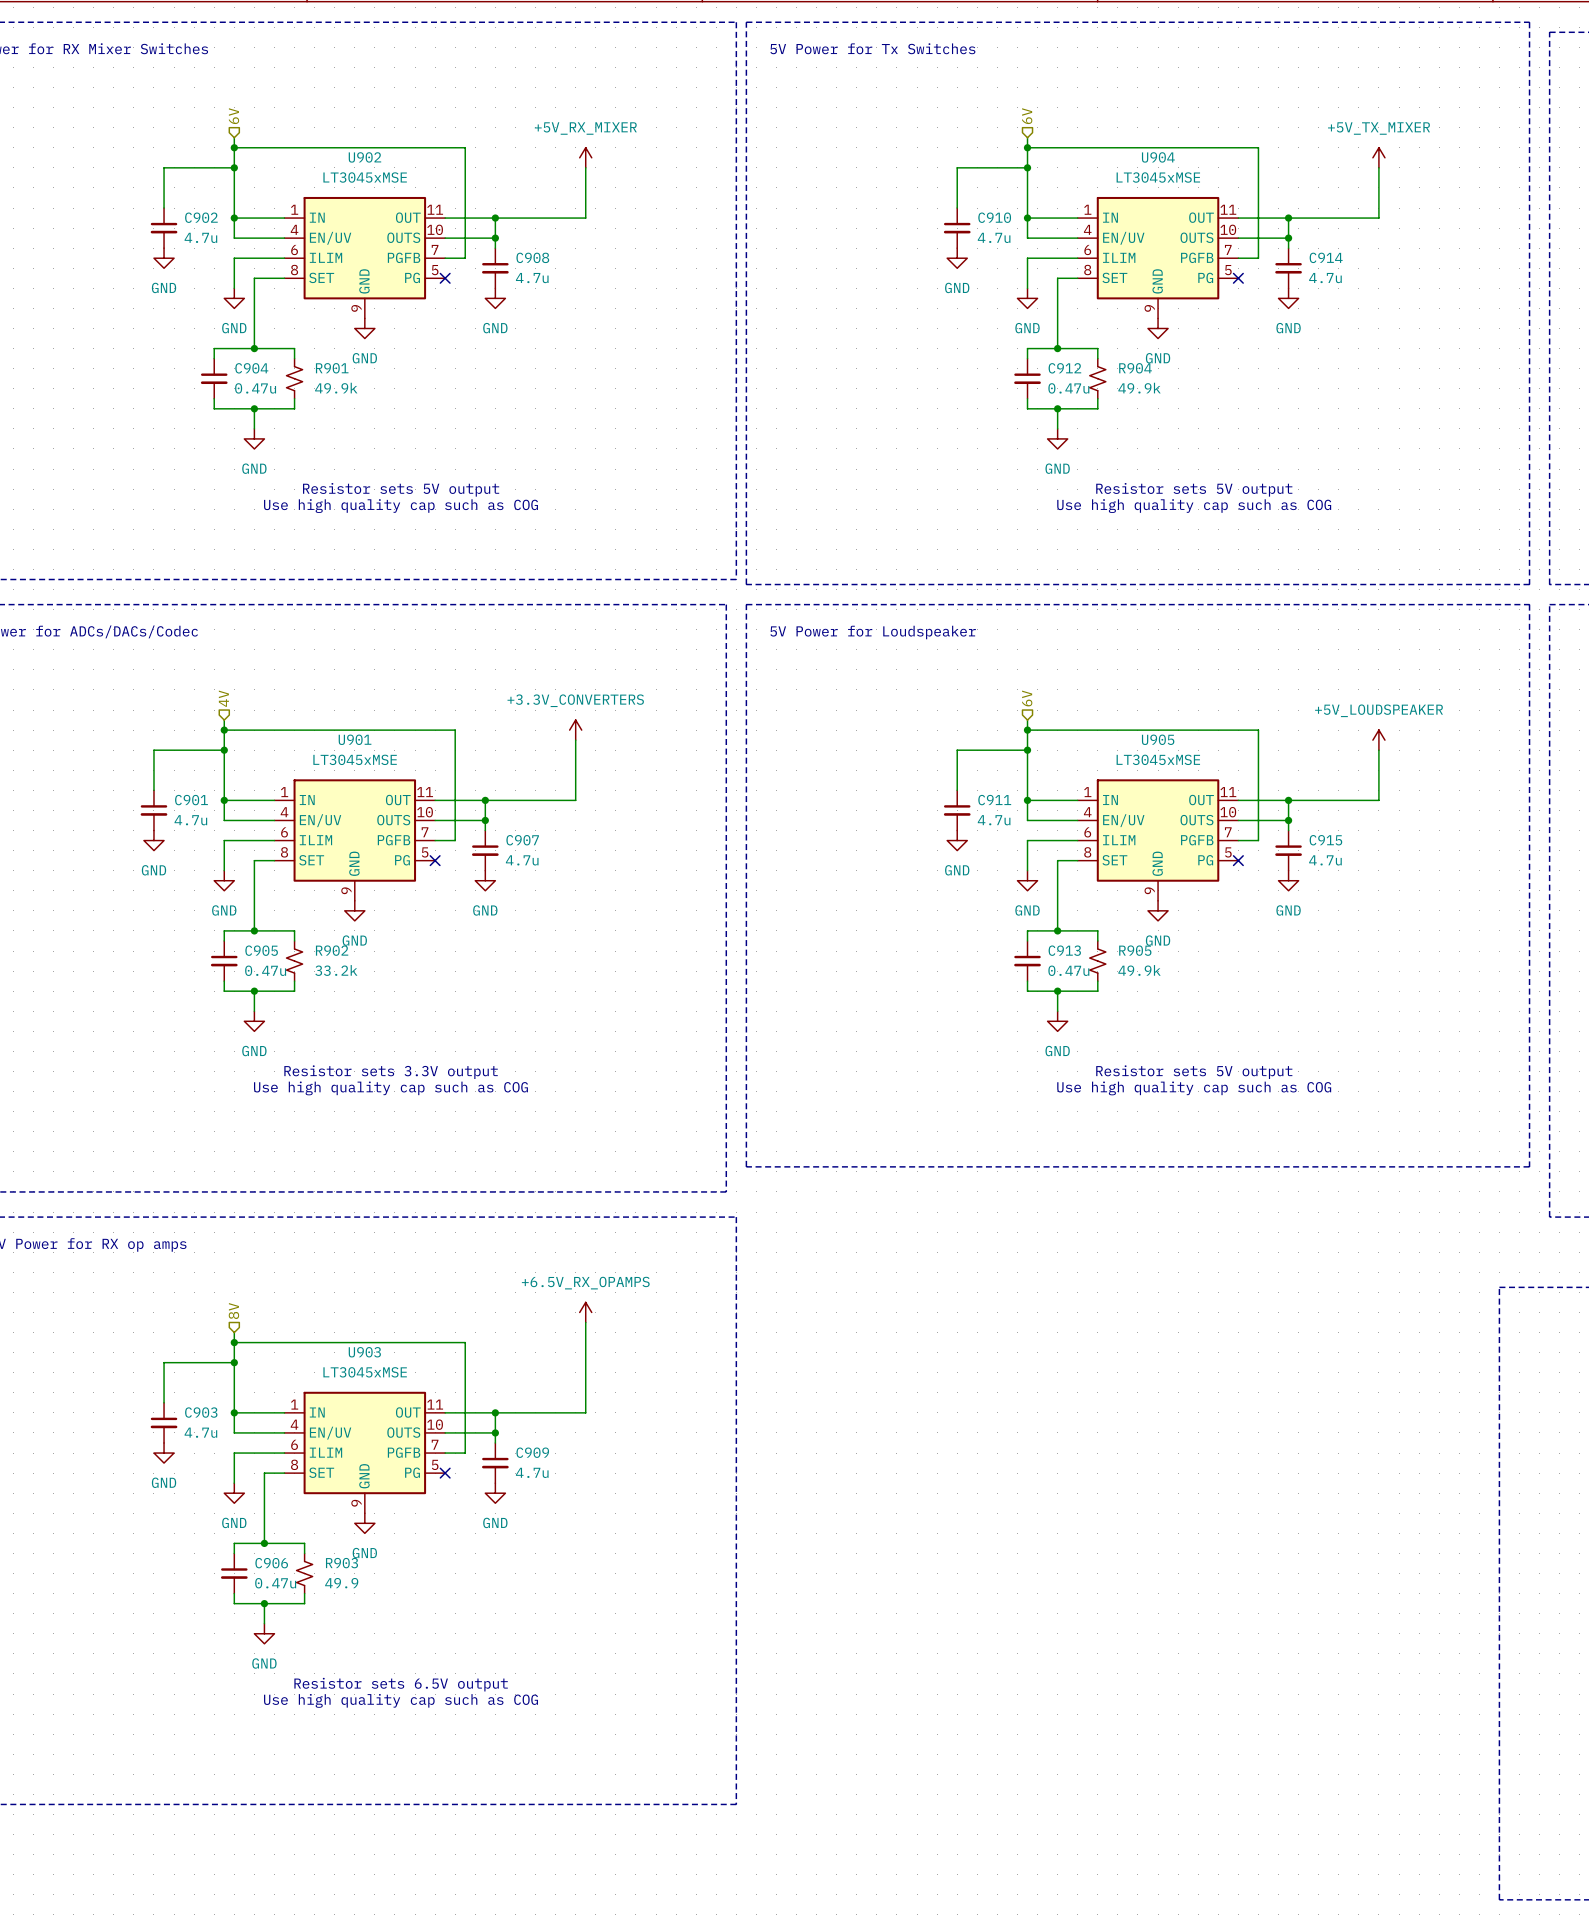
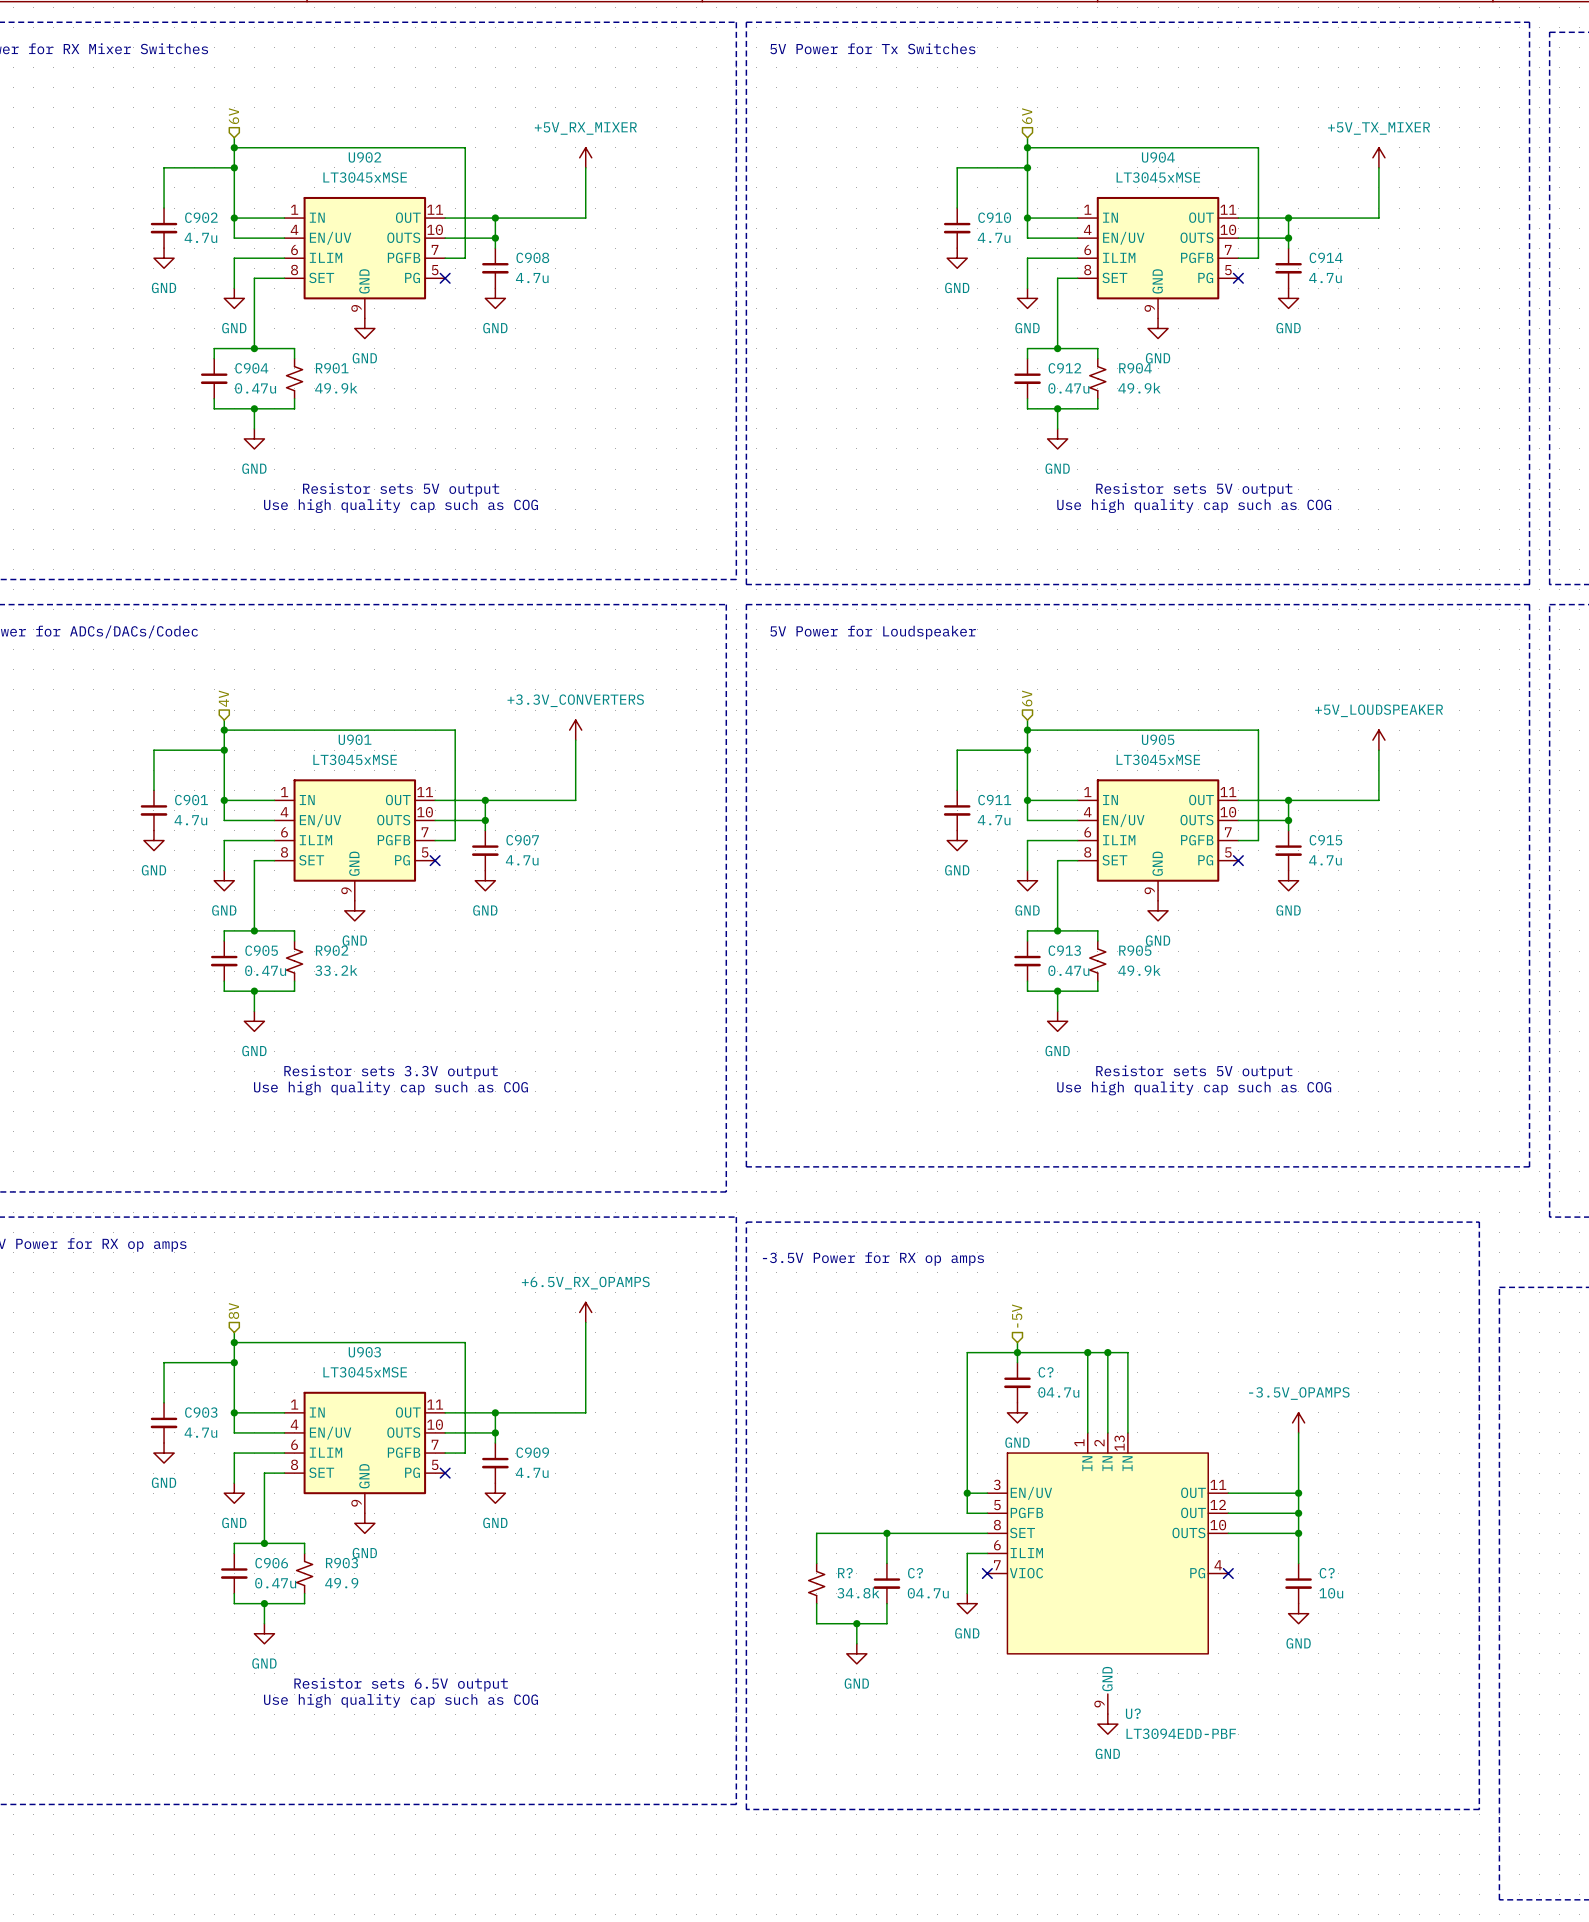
line: none -> (746, 1222) (1479, 1222) (1479, 1809) (746, 1809) (746, 1222)
text: none -> -3.5V Power for RX op amps (873, 1259)
hierarchical label: none -> -5V (1017, 1316)
wire: none -> (1017, 1342) (1017, 1362)
junction: none -> (1017, 1352)
wire: none -> (1087, 1352) (1087, 1432)
junction: none -> (1087, 1352)
wire: none -> (1107, 1352) (1107, 1432)
junction: none -> (1107, 1352)
C?: none -> 04.7u (1017, 1382)
power symbol: none -> GND (1017, 1412)
power symbol: none -> -3.5V_OPAMPS (1298, 1422)
wire: none -> (1127, 1432) (1127, 1352) (967, 1352) (967, 1513) (987, 1513)
wire: none -> (1298, 1432) (1298, 1563)
wire: none -> (967, 1493) (987, 1493)
junction: none -> (967, 1493)
wire: none -> (1228, 1493) (1298, 1493)
junction: none -> (1298, 1493)
wire: none -> (1228, 1513) (1298, 1513)
junction: none -> (1298, 1513)
wire: none -> (886, 1533) (886, 1563)
junction: none -> (886, 1533)
wire: none -> (987, 1533) (816, 1533) (816, 1563)
wire: none -> (1228, 1533) (1298, 1533)
junction: none -> (1298, 1533)
wire: none -> (987, 1553) (967, 1553) (967, 1593)
no-connect mark: none -> (987, 1573)
U?: none -> LT3094EDD-PBF (1107, 1573)
no-connect mark: none -> (1228, 1573)
R?: none -> 34.8k (816, 1583)
C?: none -> 04.7u (886, 1583)
C?: none -> 10u (1298, 1583)
wire: none -> (816, 1603) (816, 1623) (886, 1623) (886, 1603)
power symbol: none -> GND (967, 1603)
power symbol: none -> GND (1298, 1613)
wire: none -> (856, 1623) (856, 1643)
junction: none -> (856, 1623)
power symbol: none -> GND (856, 1653)
power symbol: none -> GND (1107, 1724)

